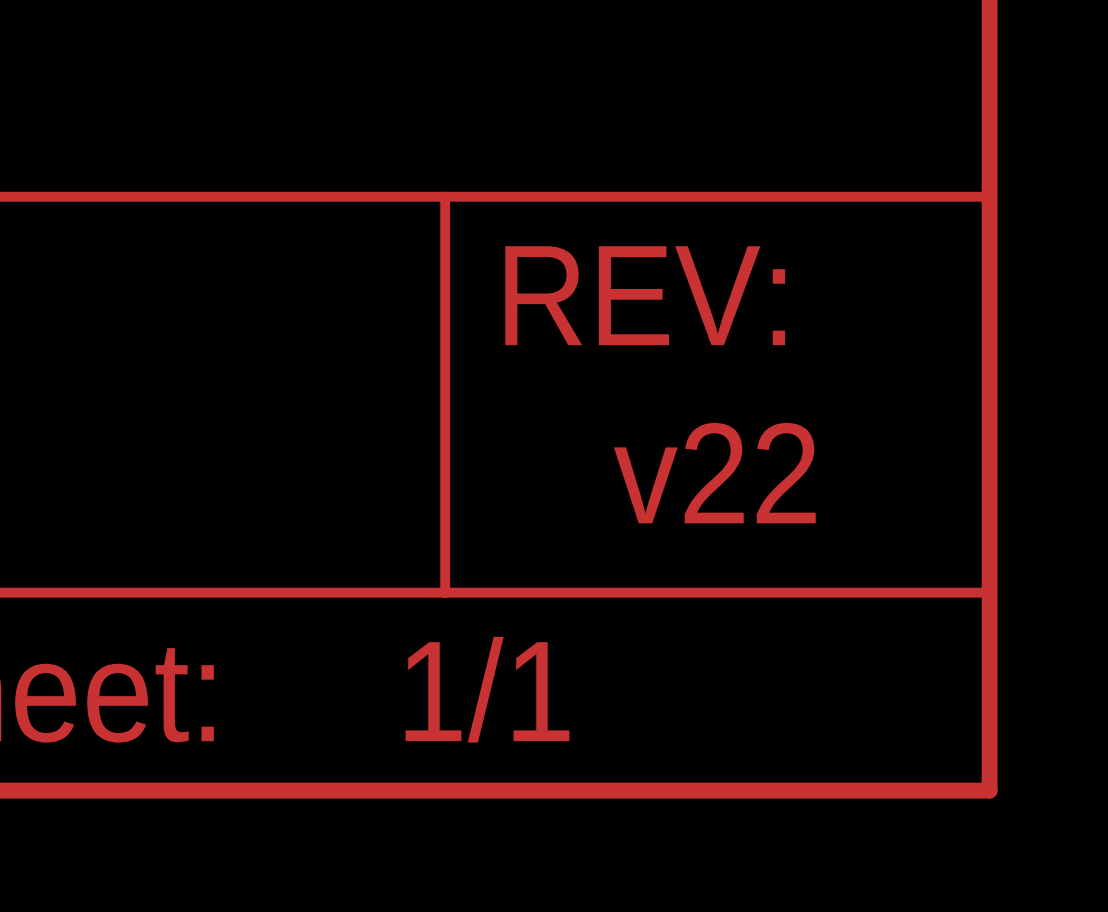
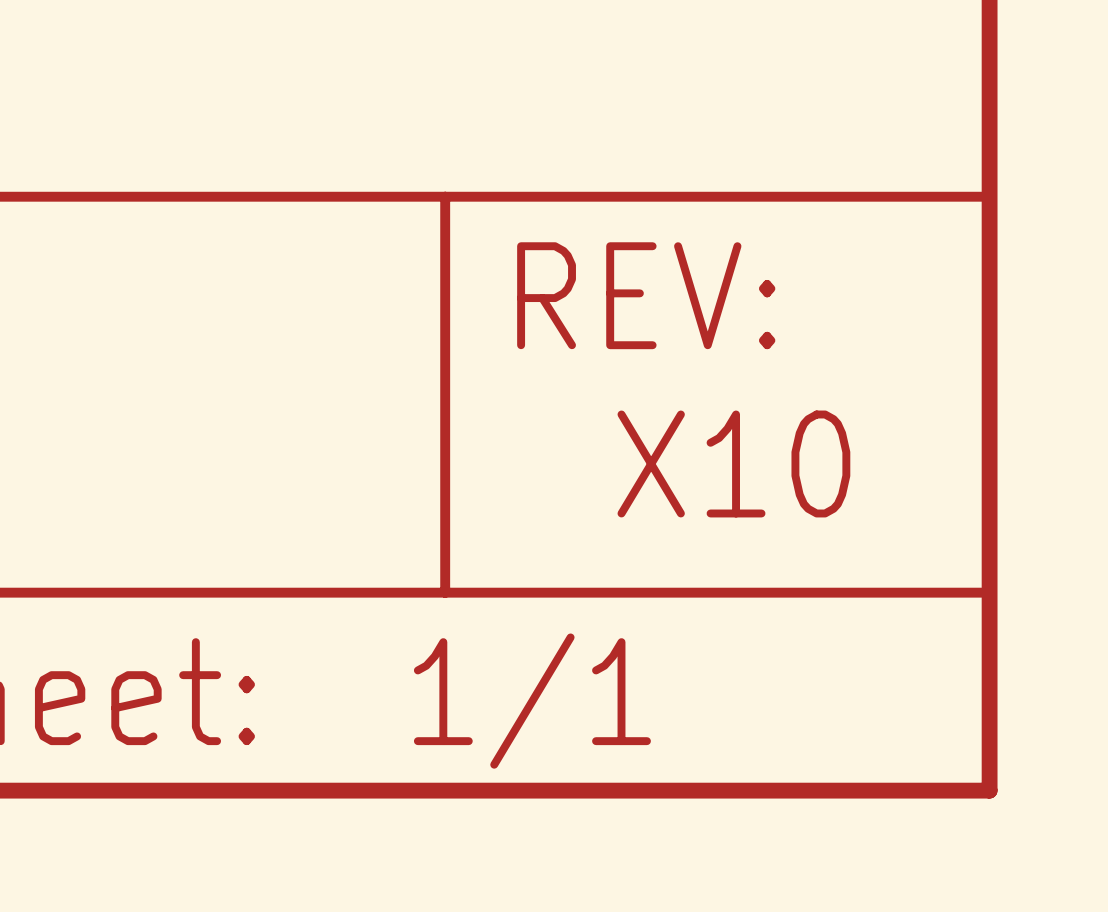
text: v22 (714, 473) -> X10 (733, 463)

